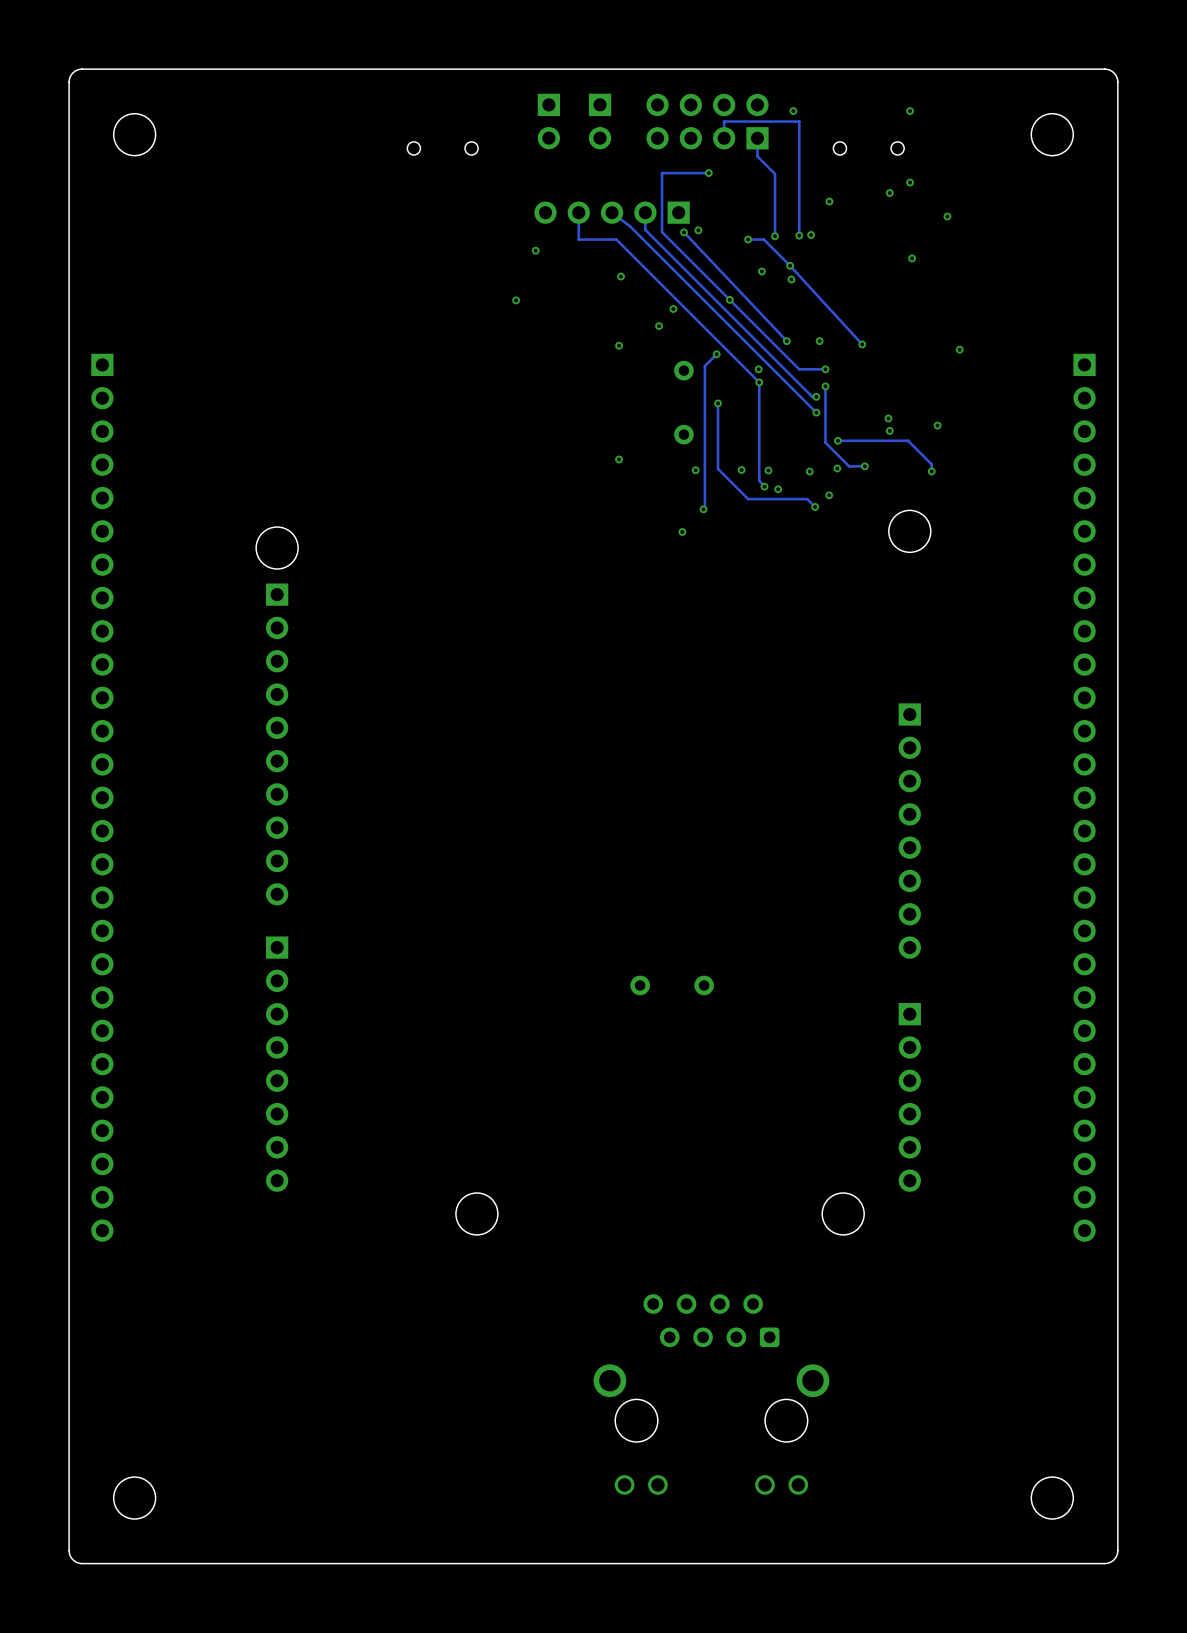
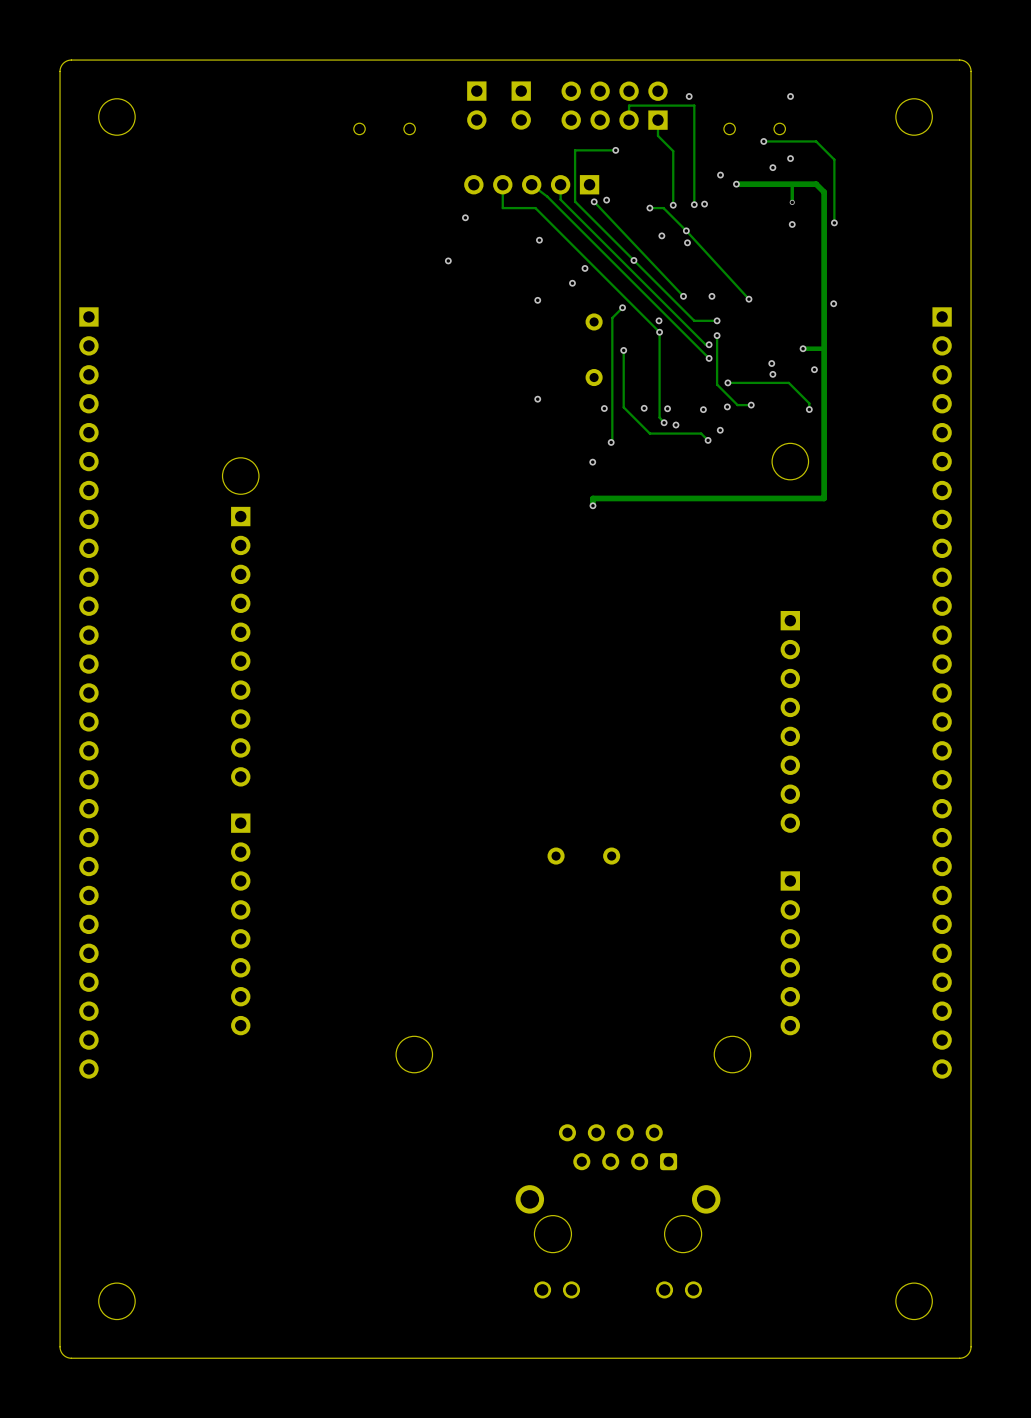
track: none -> (763, 141) (816, 141) (834, 159) (834, 222)
via: none -> (763, 141)
track: none -> (736, 184) (816, 184) (824, 192) (824, 498) (592, 498) (592, 505)
via: none -> (736, 184)
track: none -> (792, 184) (792, 202)
via position: (947, 216) -> (834, 222)
via: none -> (792, 202)
via: none -> (803, 348)
track: none -> (824, 348) (803, 348)
via: none -> (592, 505)

